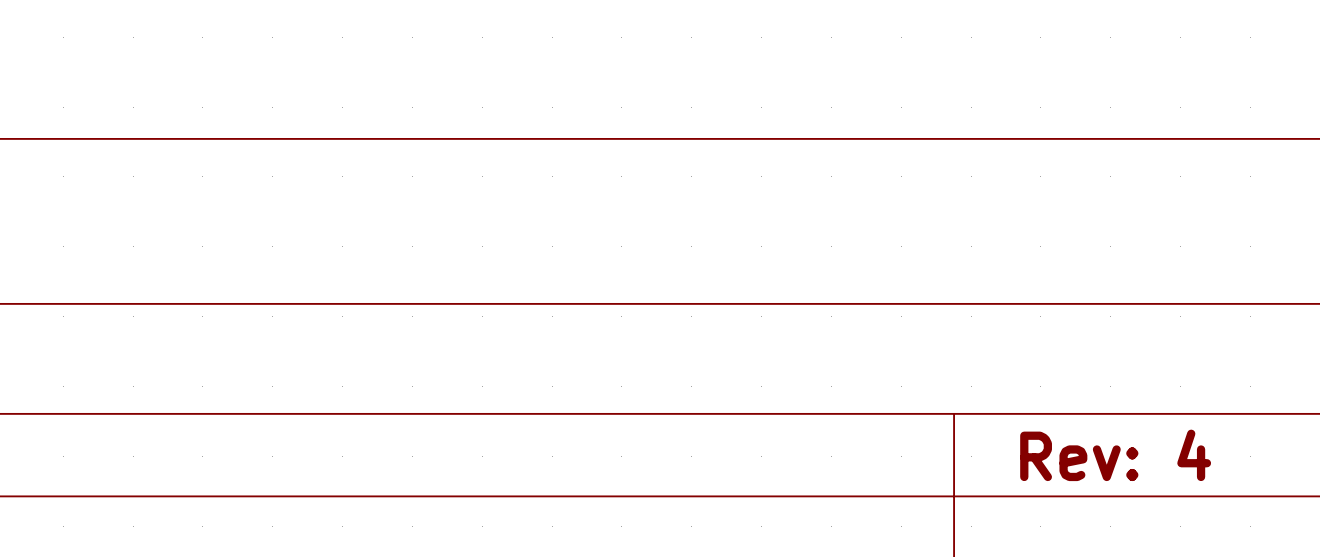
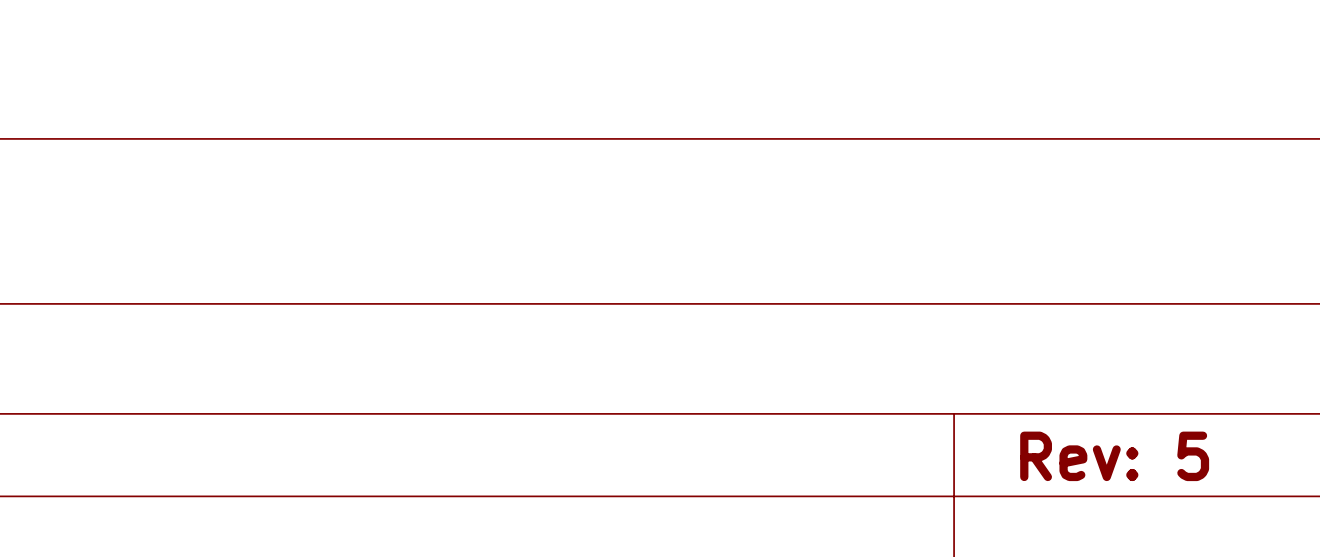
title block: Rev: 4 (1115, 455) -> Rev: 5 (1114, 456)

